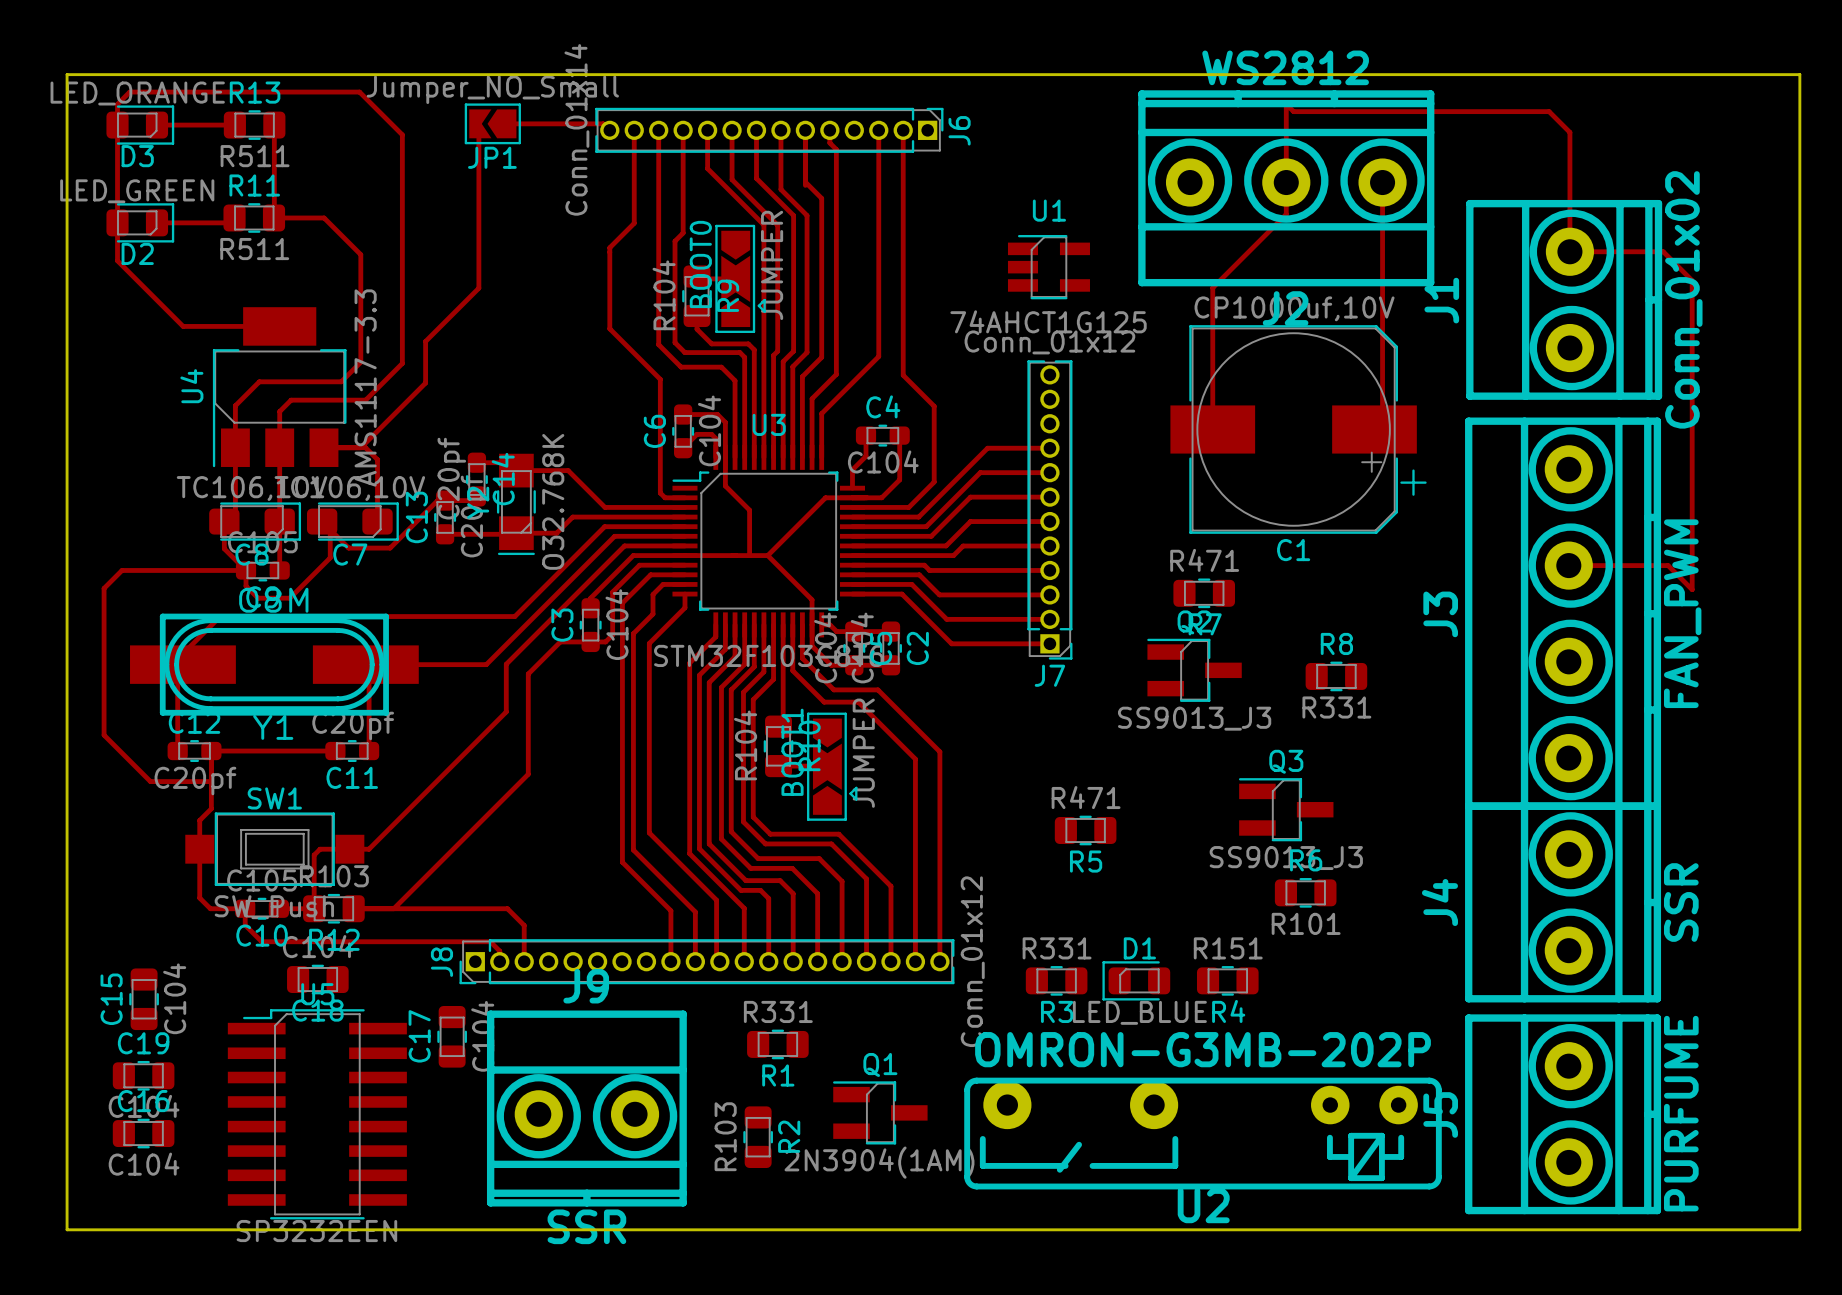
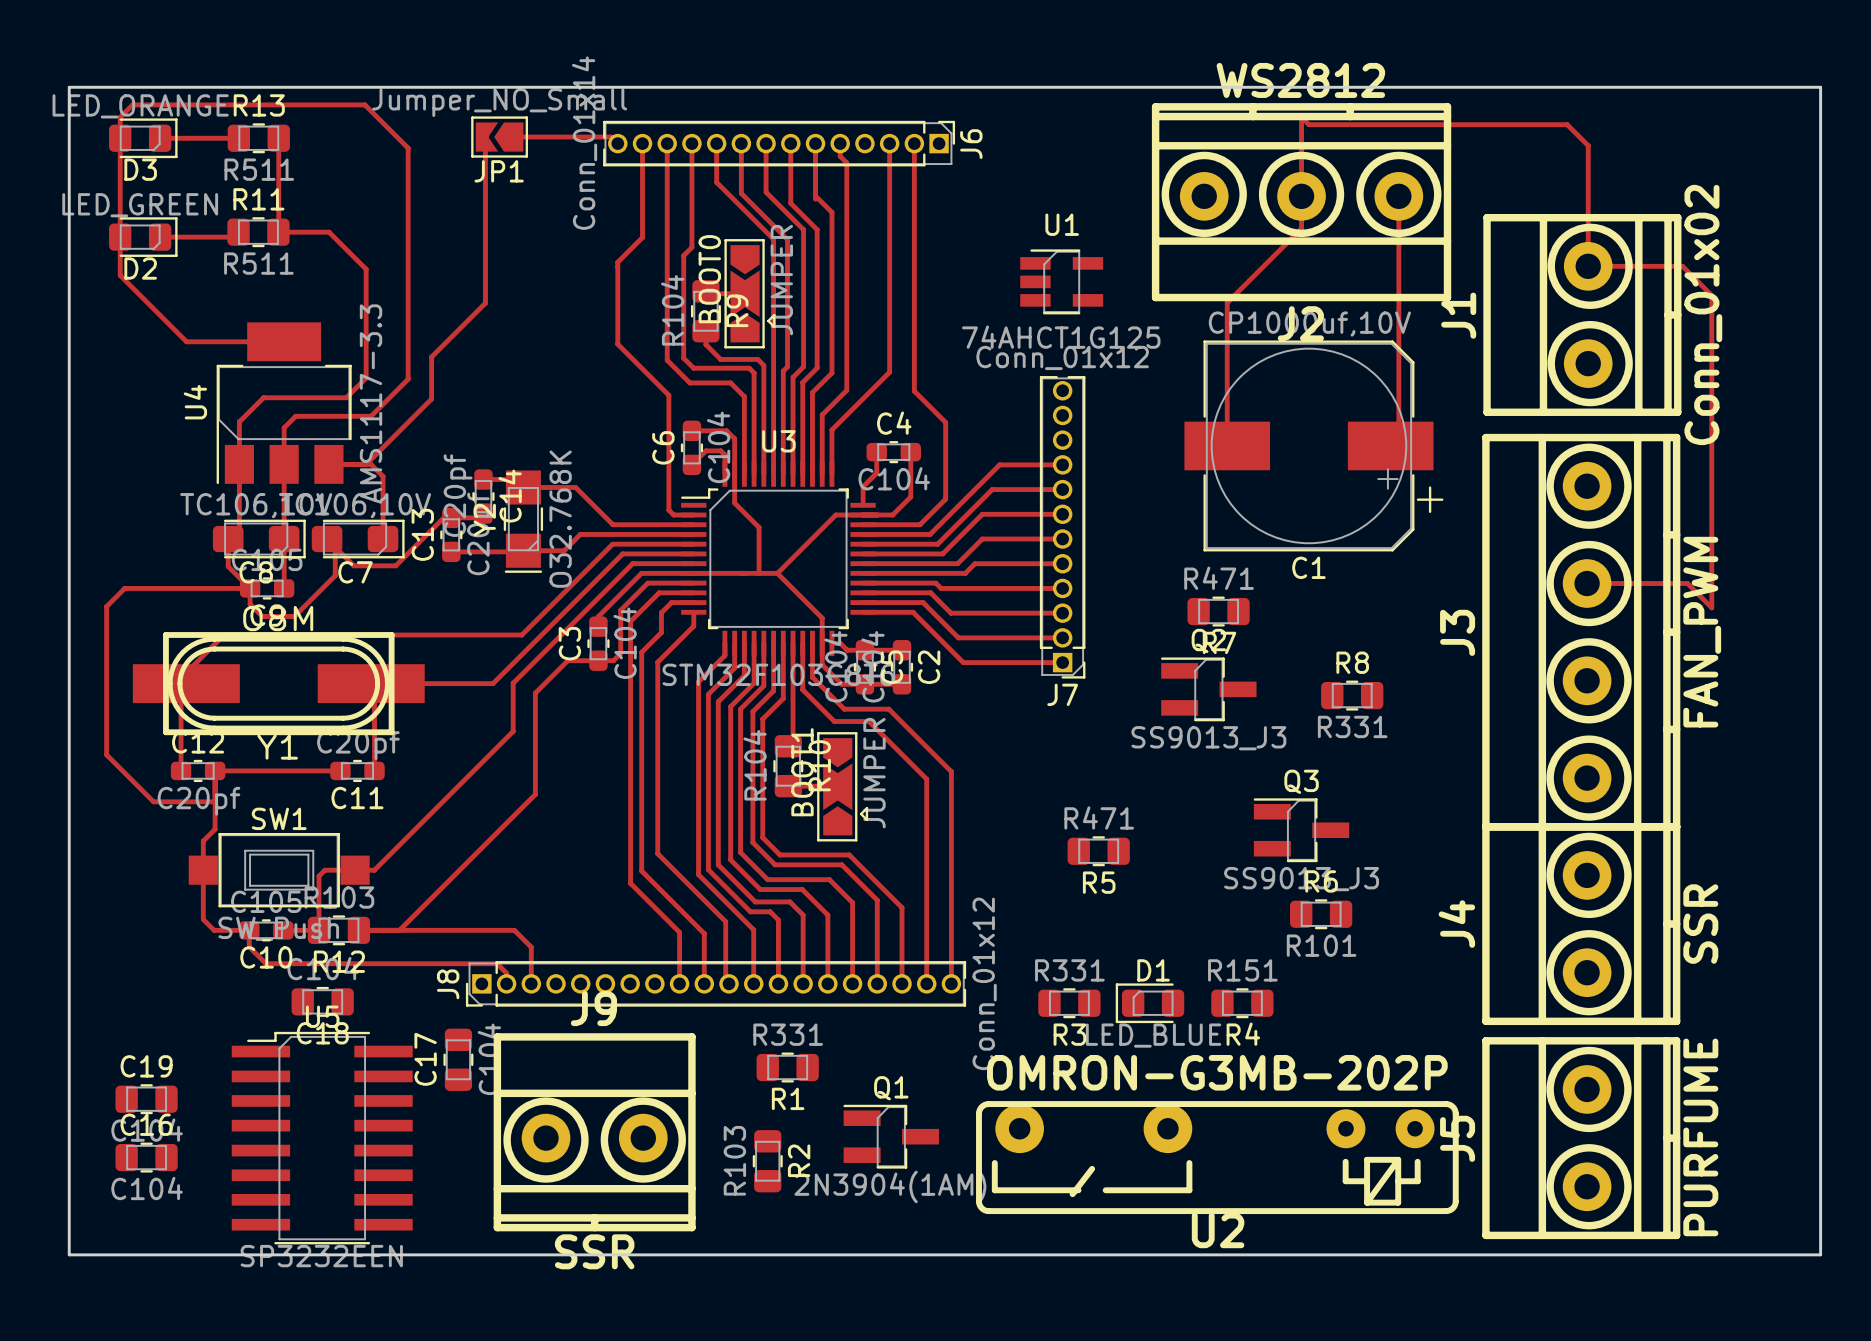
C15: C104 (144, 999) -> none

